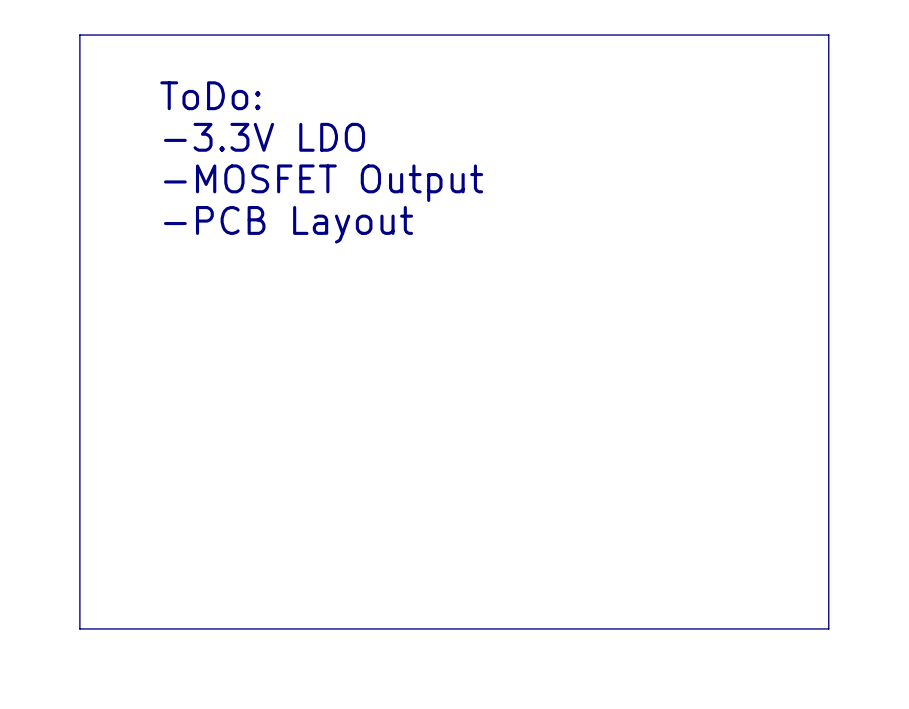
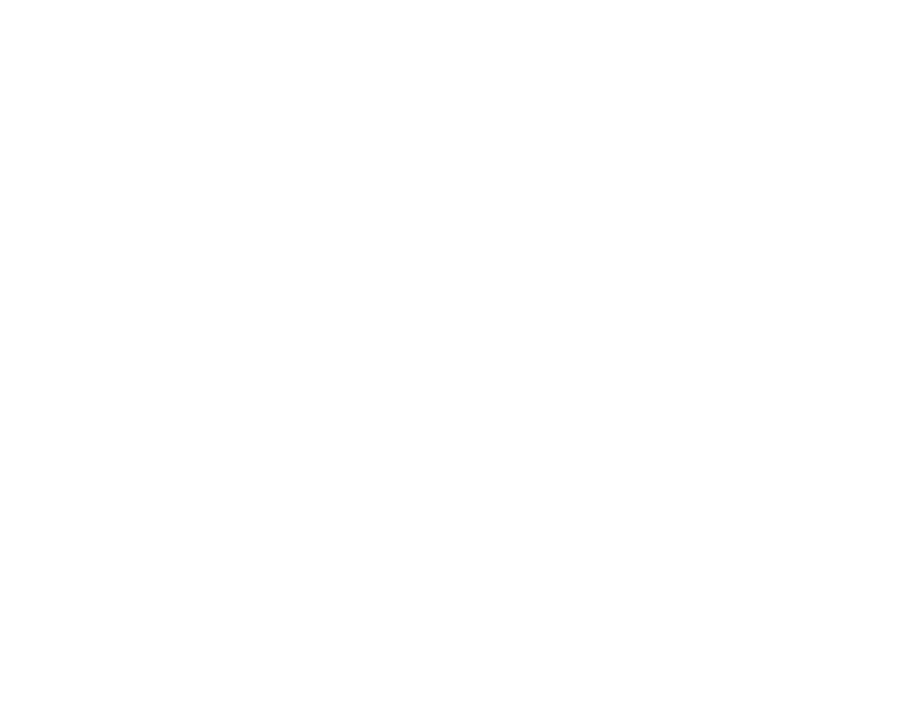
line: (79, 35) (828, 35) (828, 628) (79, 628) (79, 35) -> none
text: ToDo: (210, 95) -> none
text: -3.3V LDO (264, 137) -> none
text: -MOSFET Output (323, 183) -> none
text: -PCB Layout (288, 224) -> none

